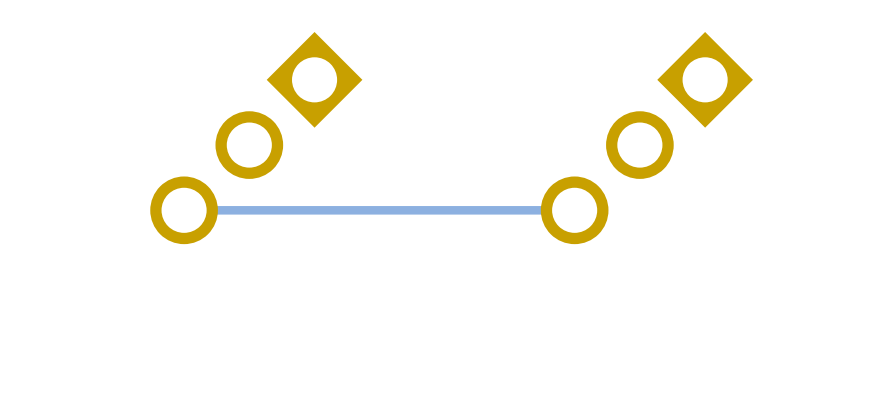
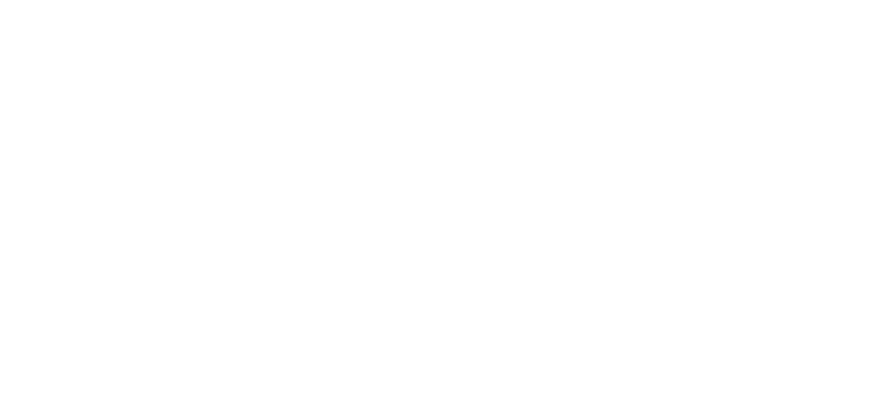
part: (256, 138) -> none
part: (646, 138) -> none
track: (574, 210) (184, 210) -> none

